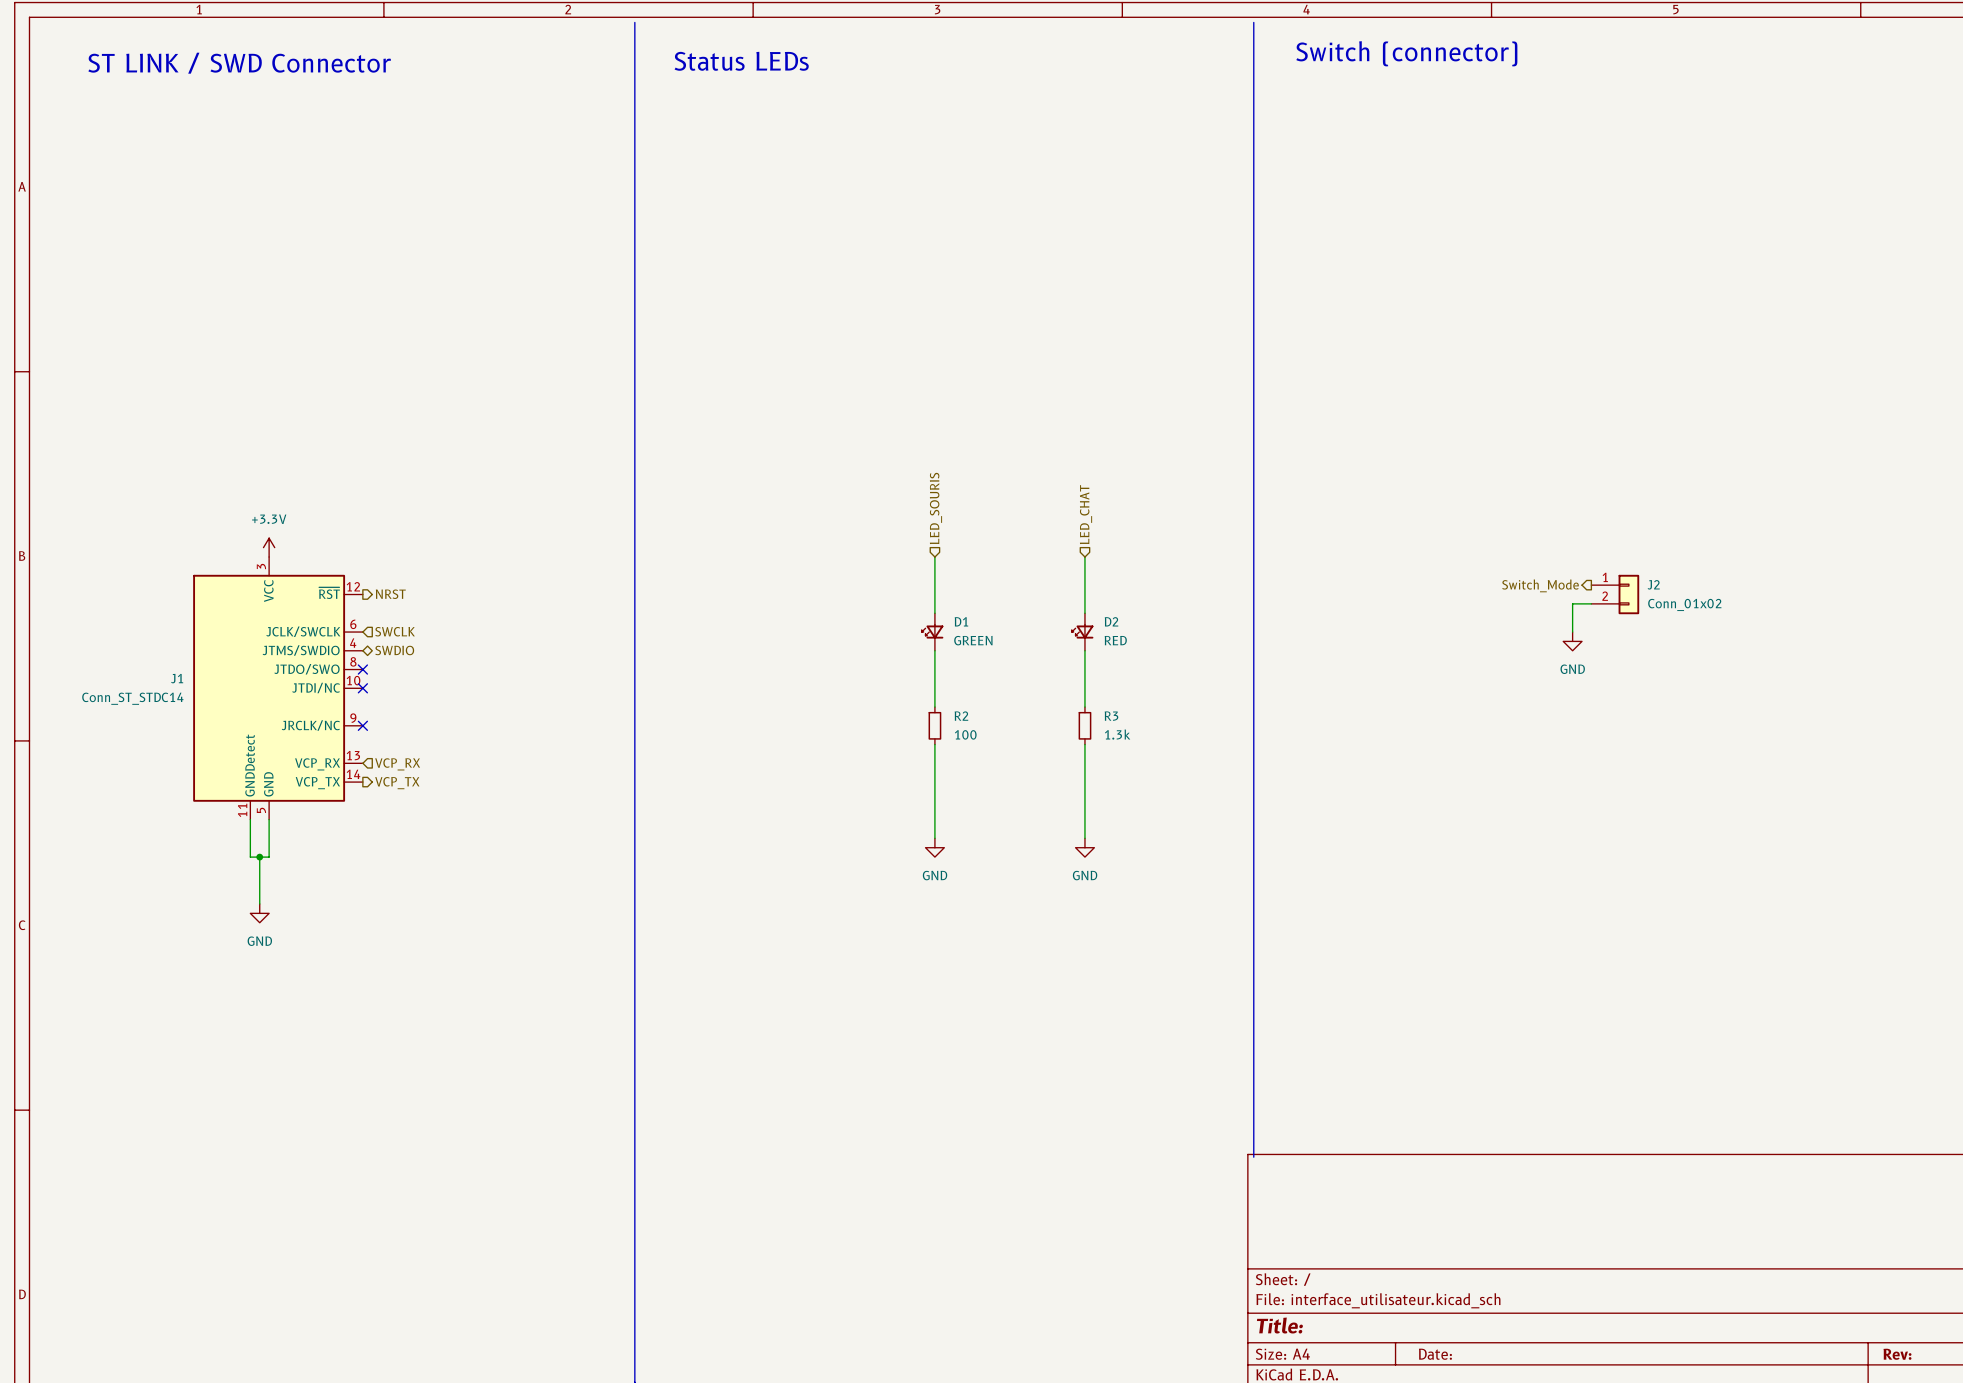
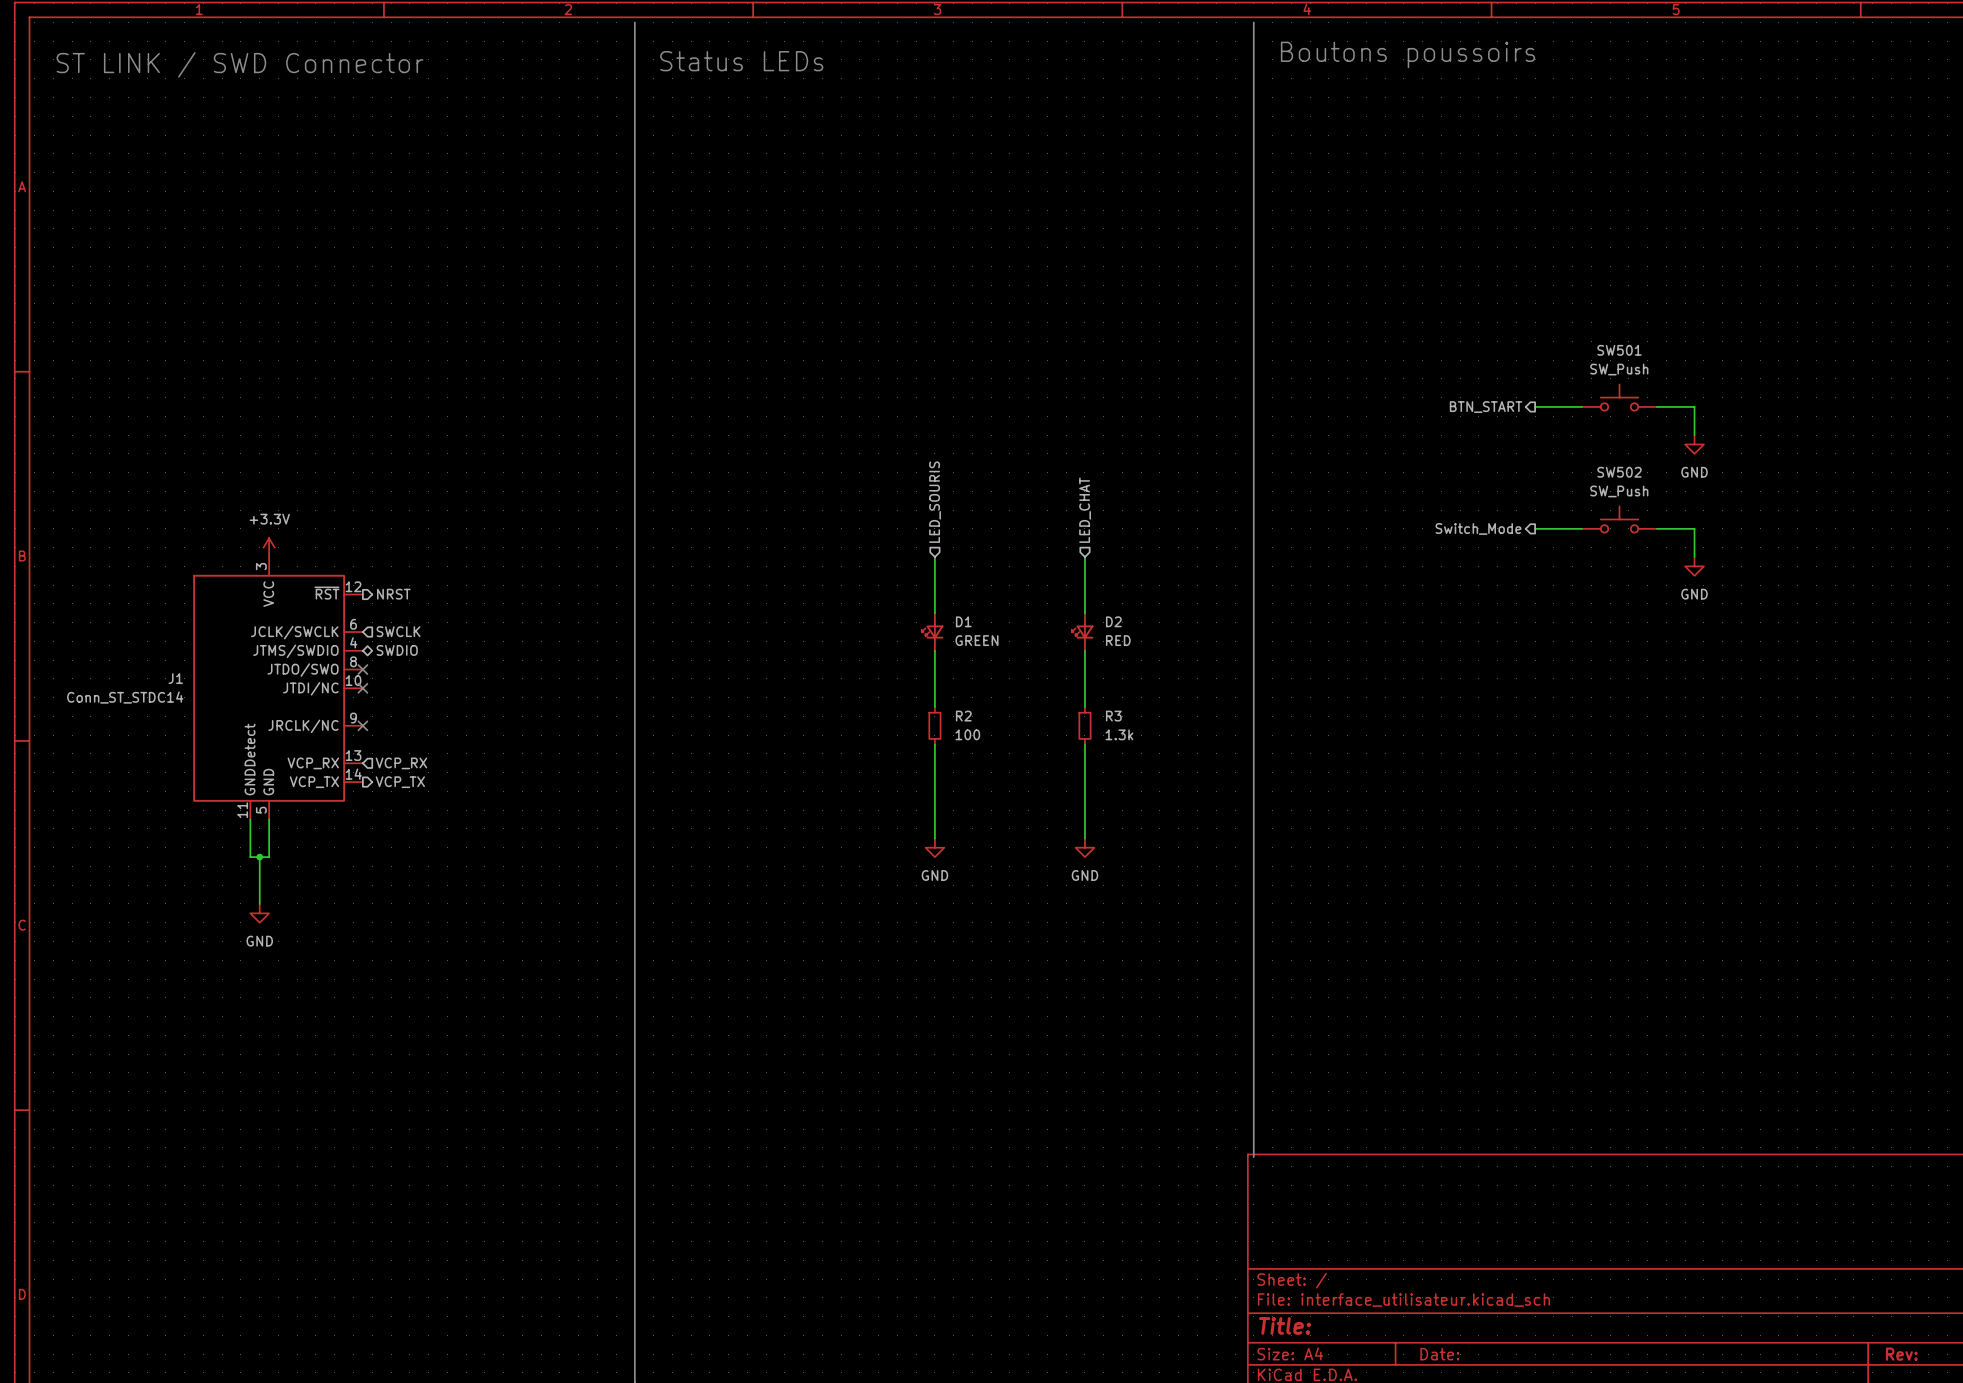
text: Switch (connector) (1406, 53) -> Boutons poussoirs (1408, 54)
SW501: none -> SW_Push (1619, 397)
wire: none -> (1535, 406) (1582, 406)
wire: none -> (1657, 406) (1694, 406) (1694, 435)
hierarchical label: none -> BTN_START (1486, 407)
power symbol: none -> GND (1694, 444)
SW502: none -> SW_Push (1619, 519)
wire: none -> (1535, 528) (1582, 528)
wire: none -> (1657, 528) (1694, 528) (1694, 557)
power symbol: none -> GND (1694, 566)
hierarchical label position: Switch_Mode (1540, 585) -> Switch_Mode (1478, 528)
J2: Conn_01x02 (1615, 594) -> none
wire: (1591, 603) (1572, 603) (1572, 632) -> none
power symbol: GND (1572, 641) -> none

